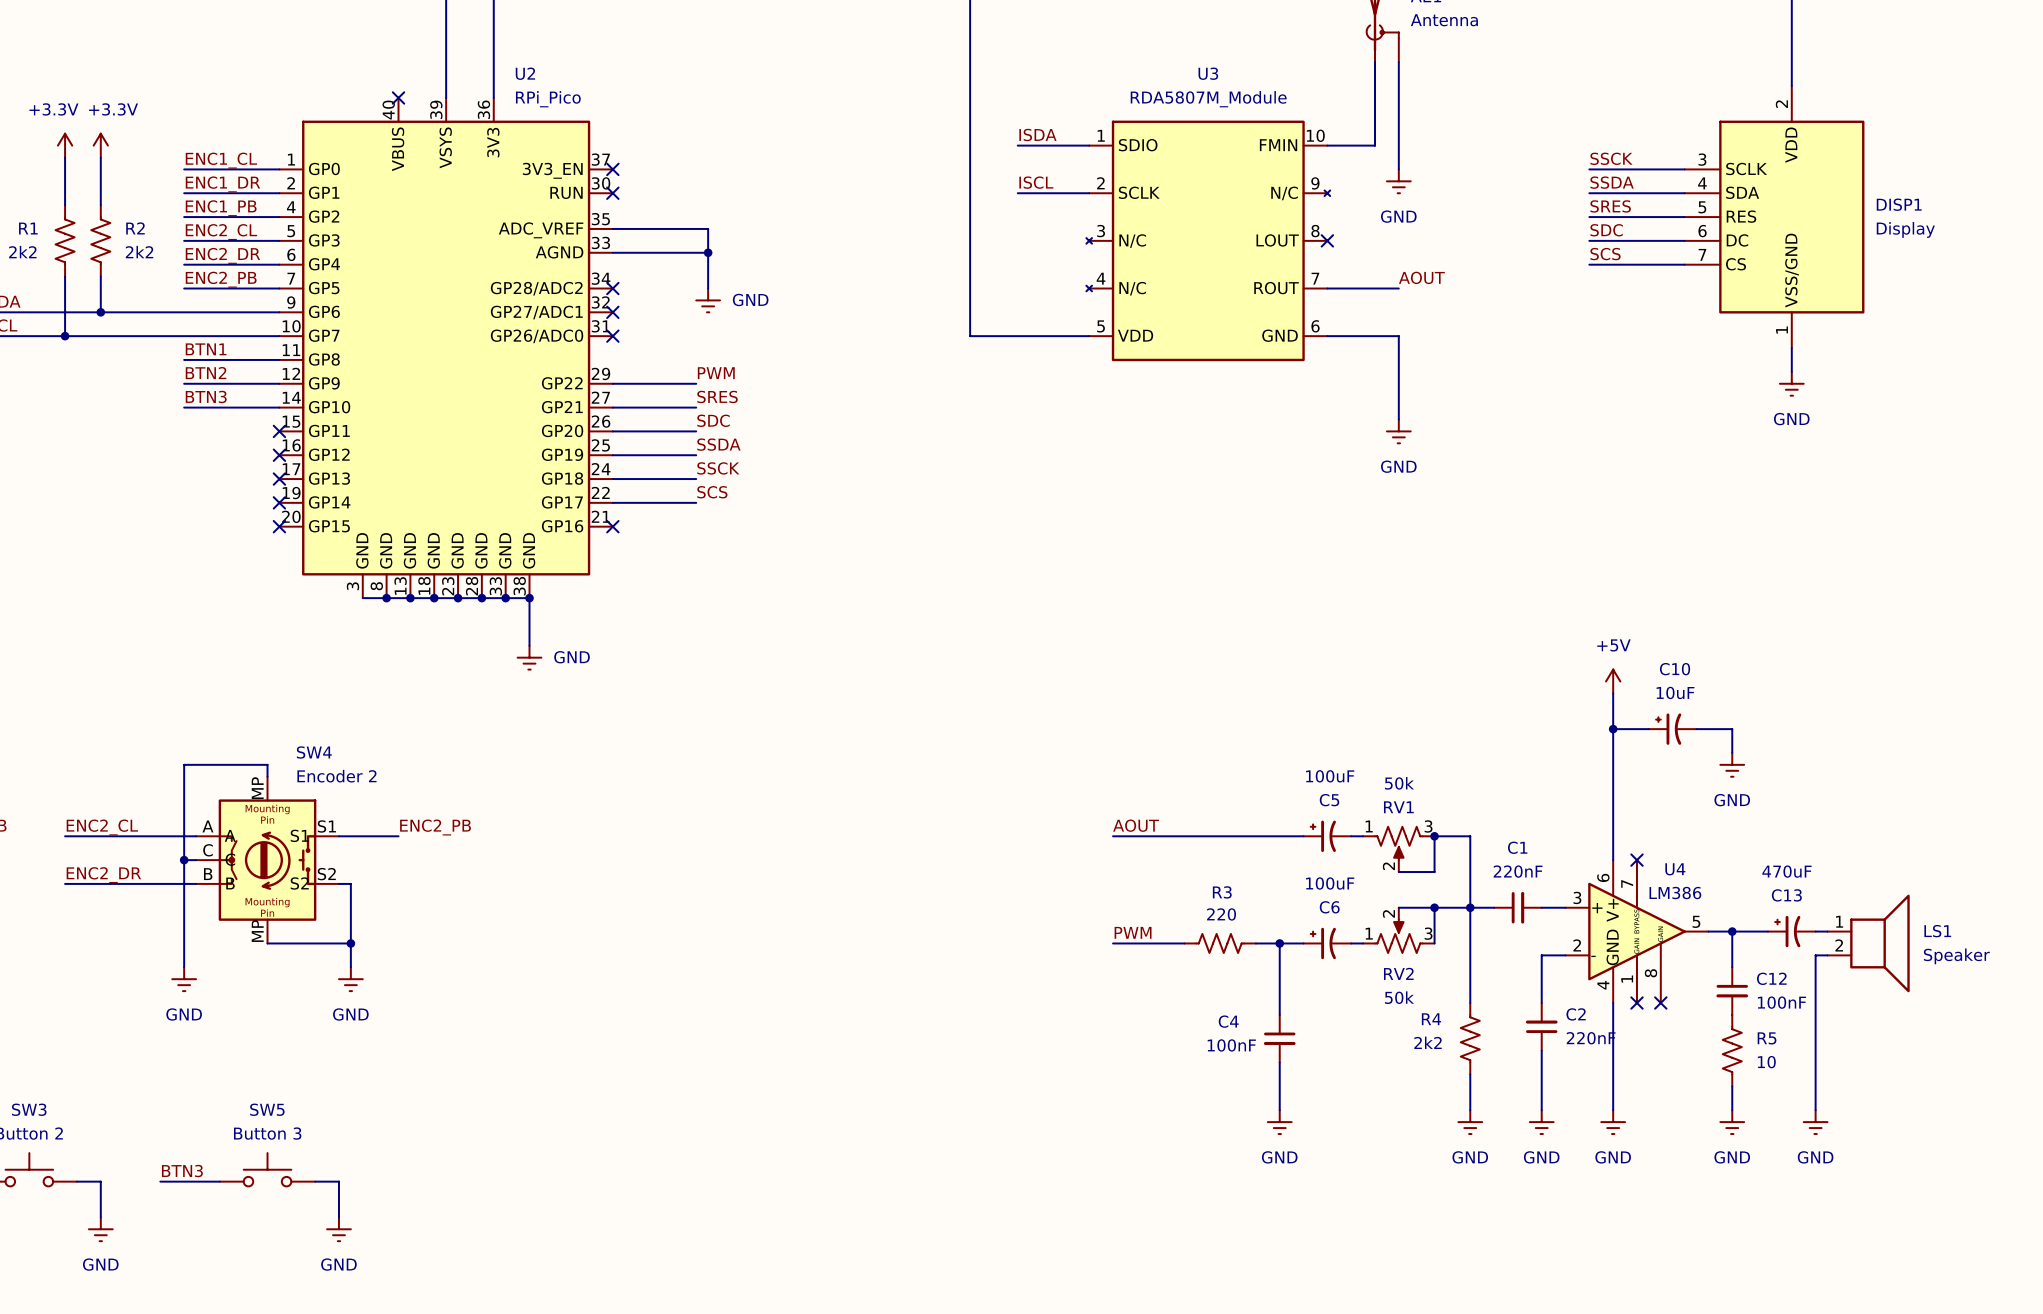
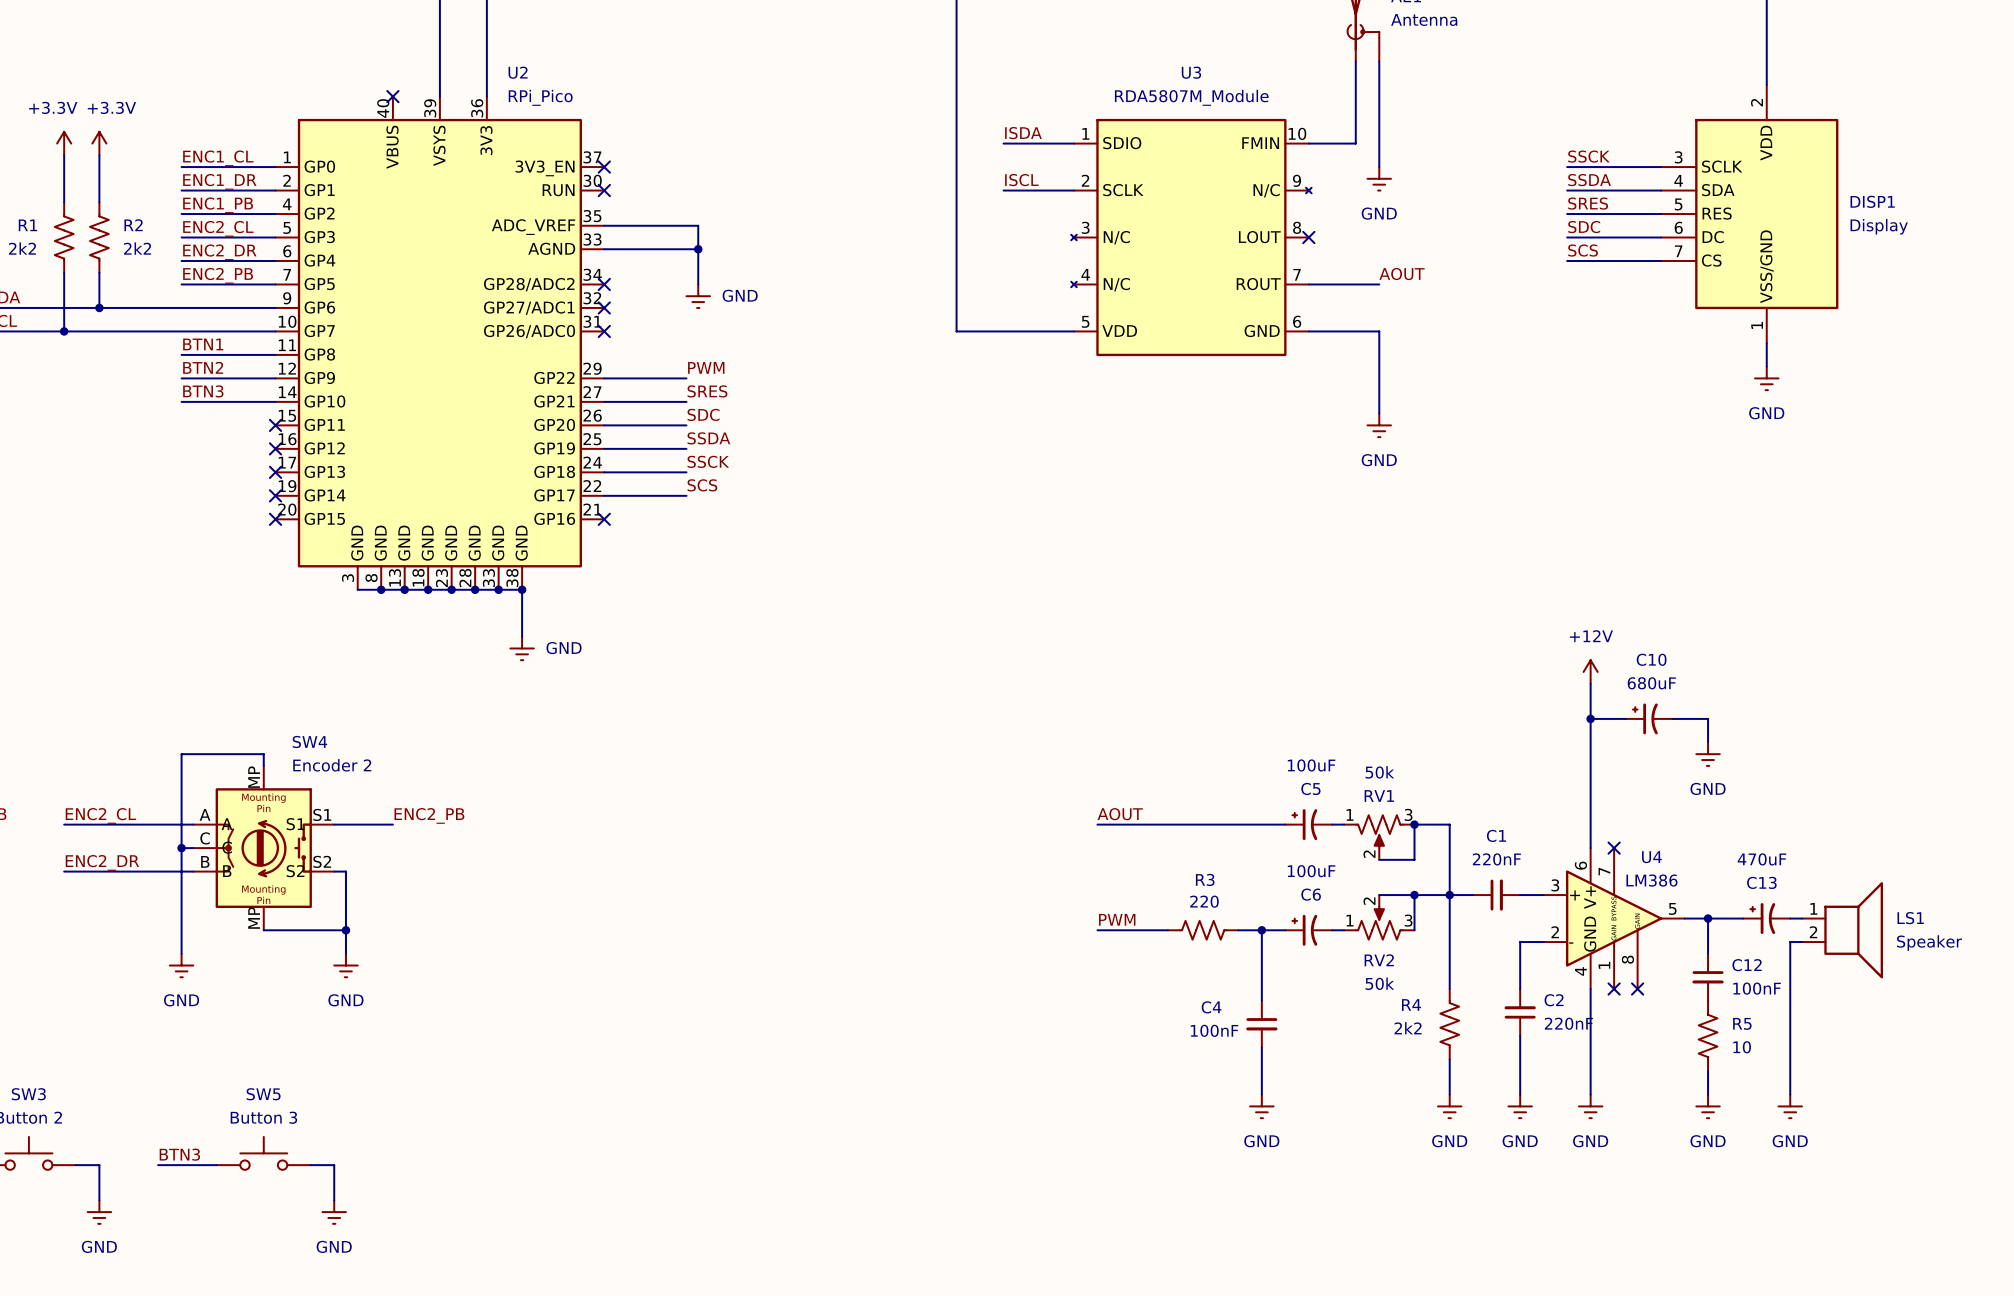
power symbol: +5V (1613, 681) -> +12V (1590, 671)
C10 value: 10uF (1675, 692) -> 680uF (1651, 683)

